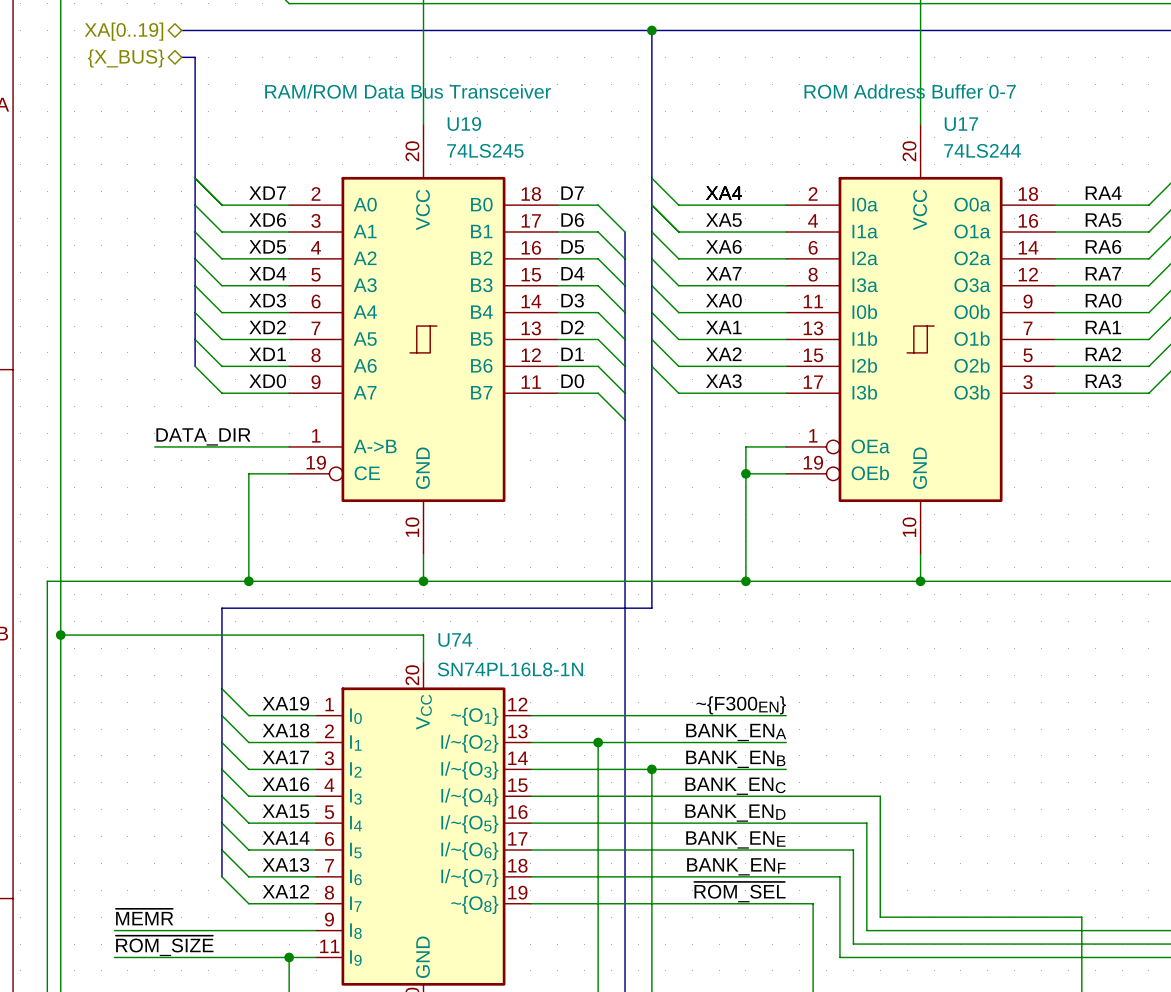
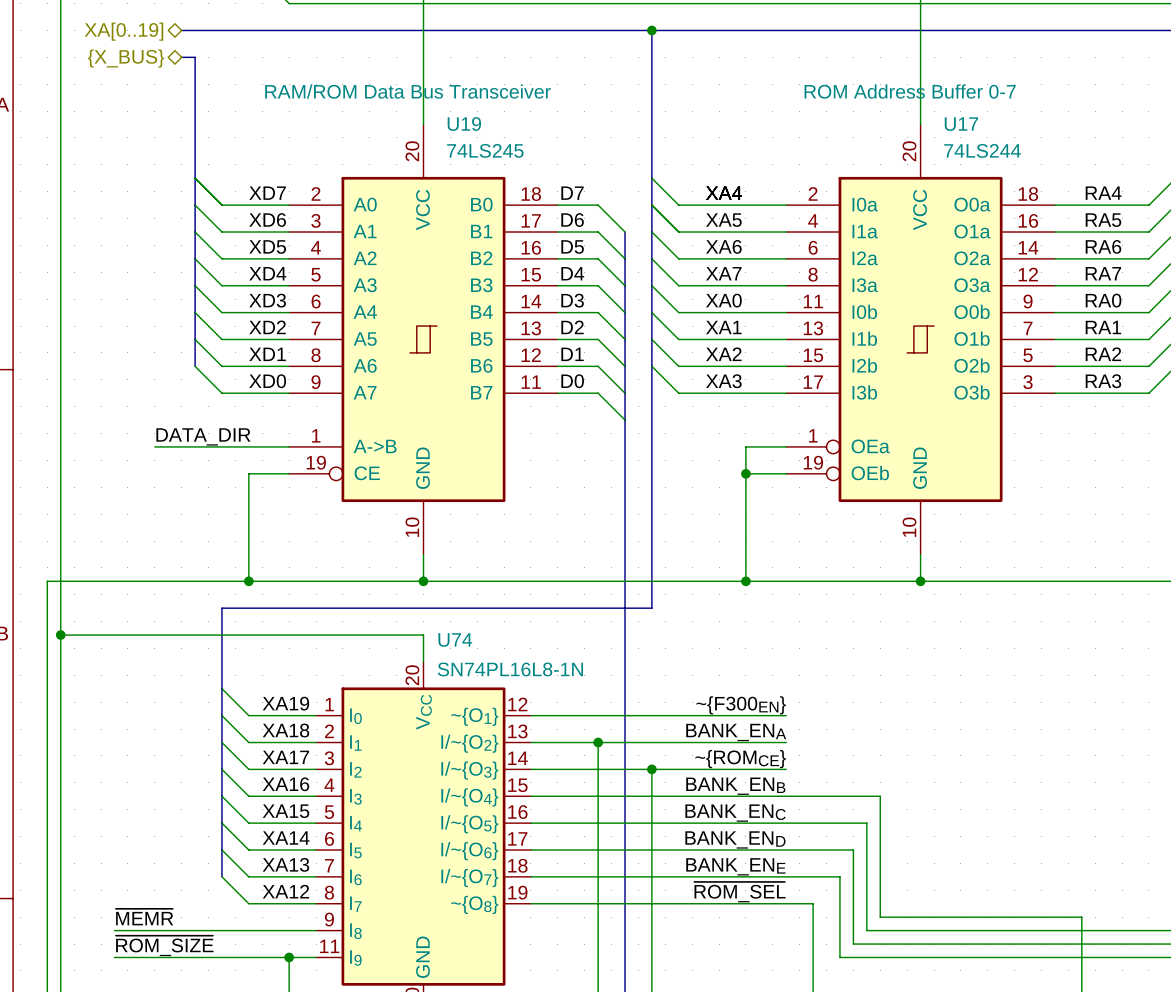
label: BANK_ENB (735, 759) -> ~{ROMCE} (740, 759)
label: BANK_ENC (735, 786) -> BANK_ENB (735, 786)
label: BANK_END (735, 813) -> BANK_ENC (735, 813)
label: BANK_ENE (735, 839) -> BANK_END (735, 839)
label: BANK_ENF (736, 866) -> BANK_ENE (735, 866)

